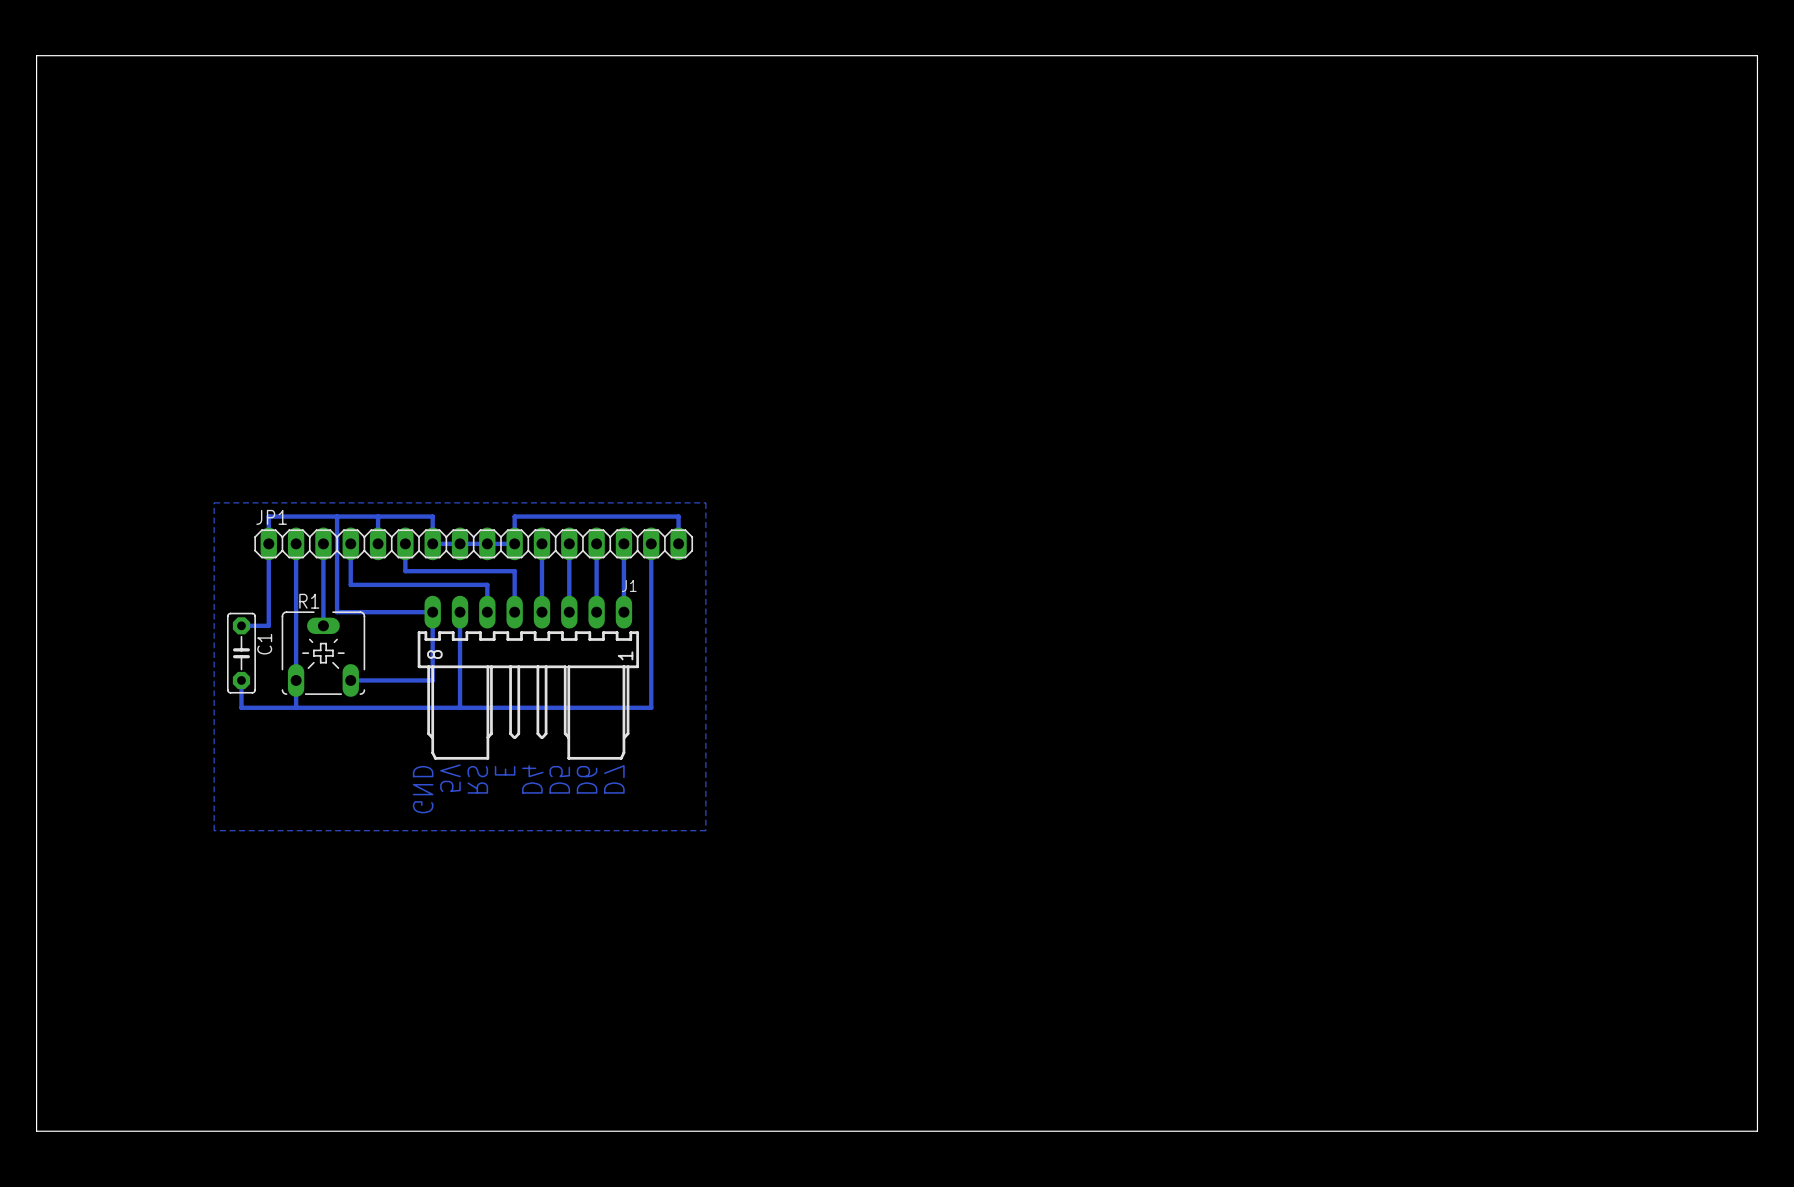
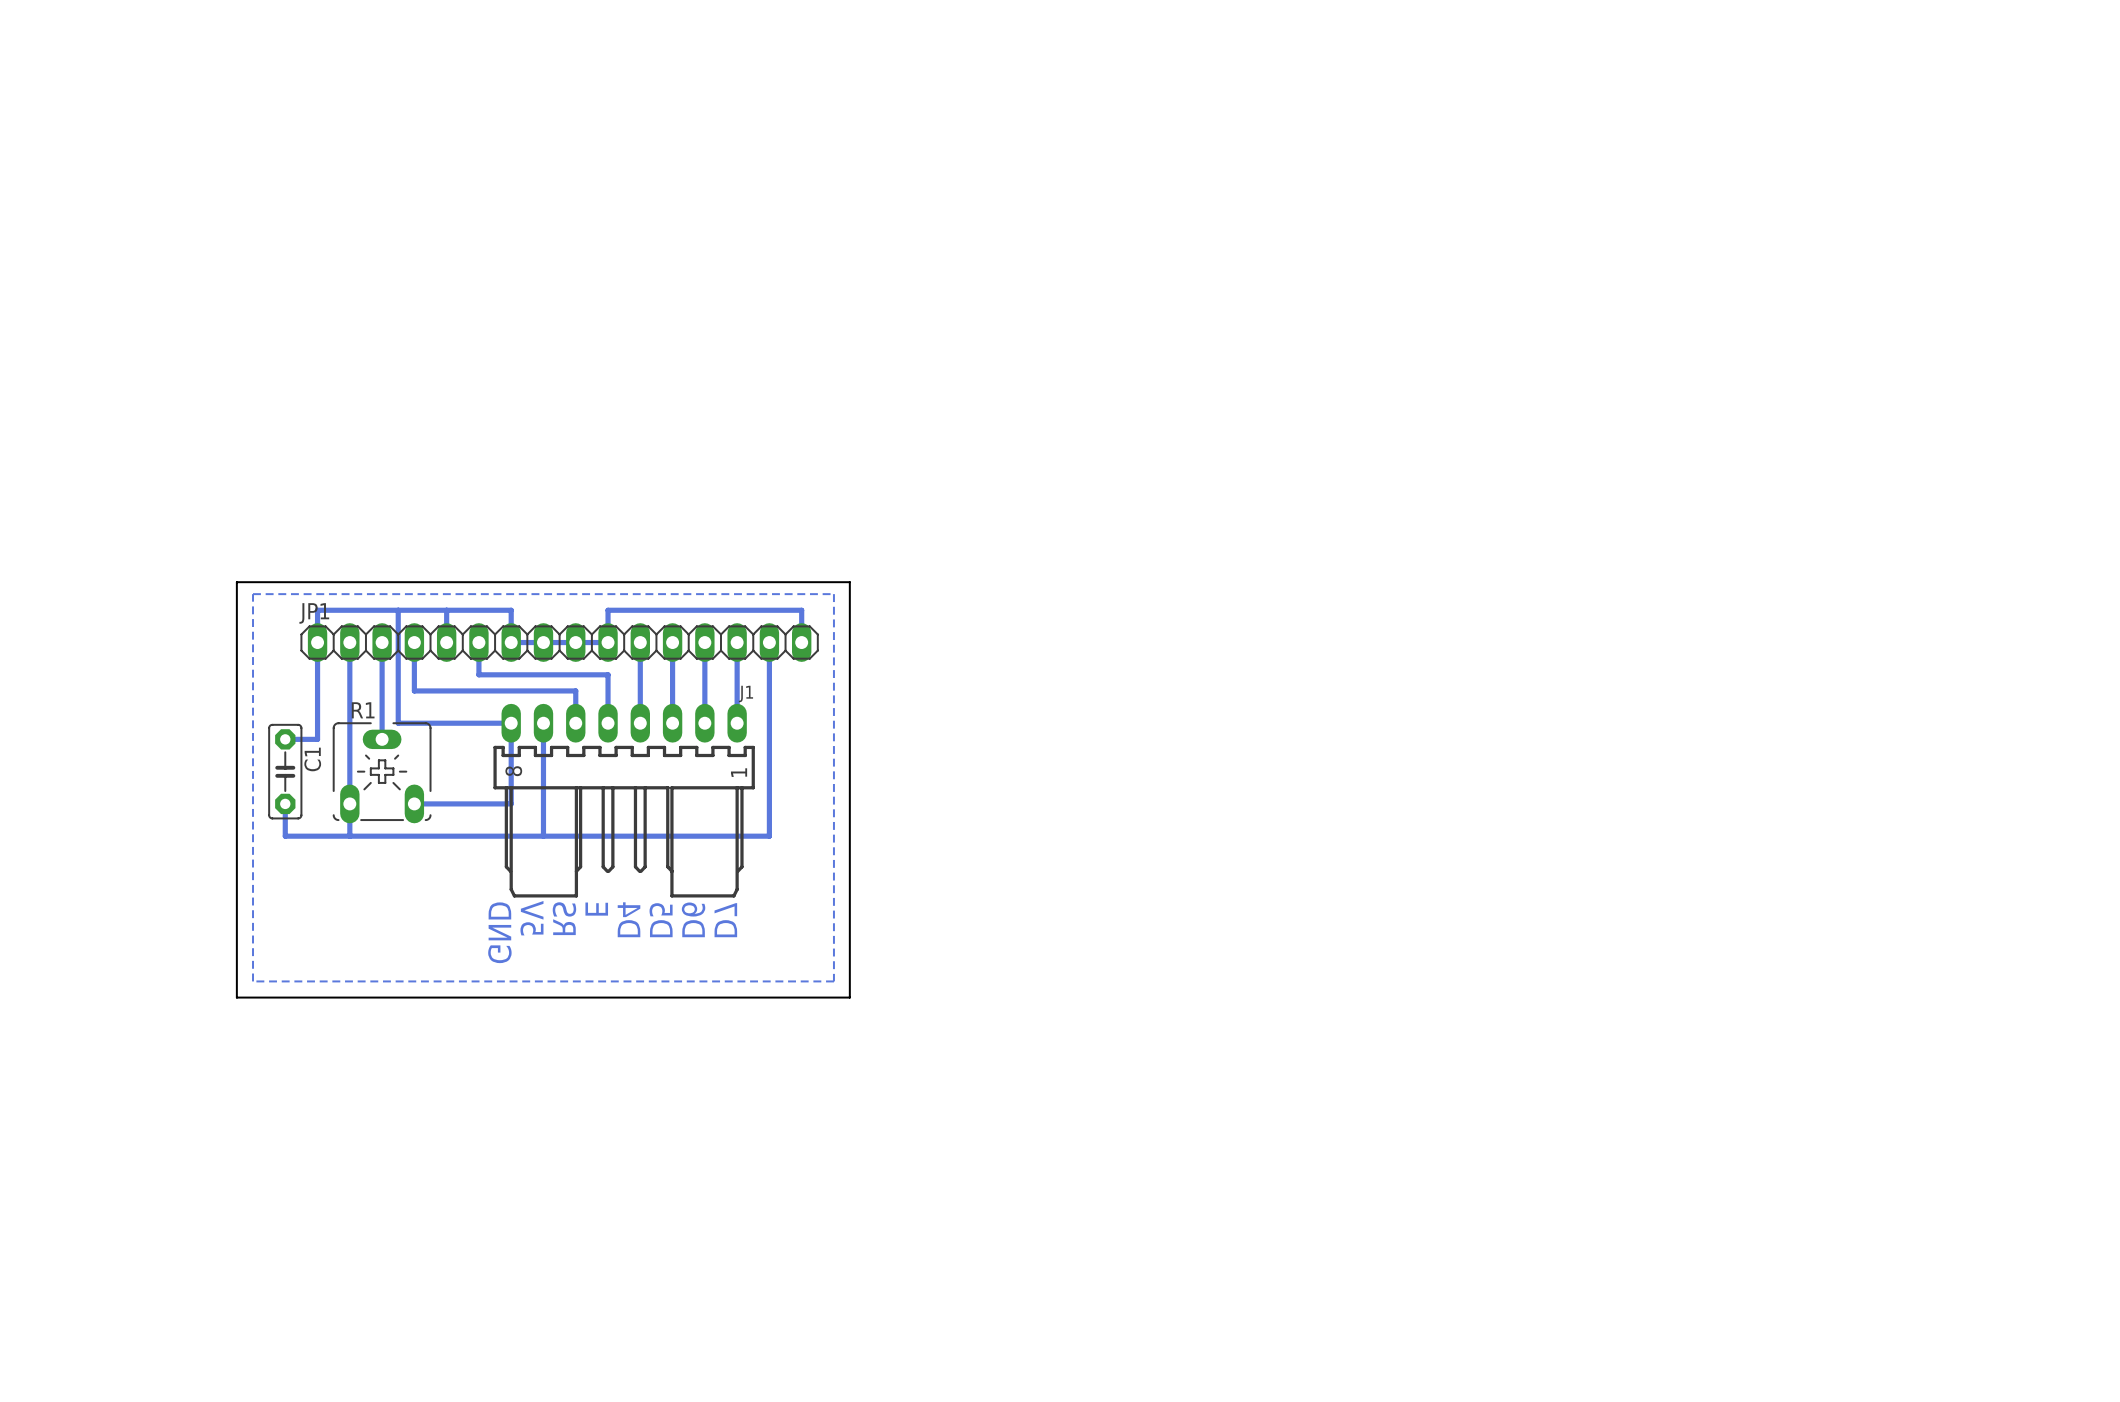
board edge: (36, 55) (1757, 55) (1757, 1131) (36, 1131) (36, 55) -> none
board edge: none -> (236, 582) (849, 582) (849, 997) (236, 997) (236, 582)

